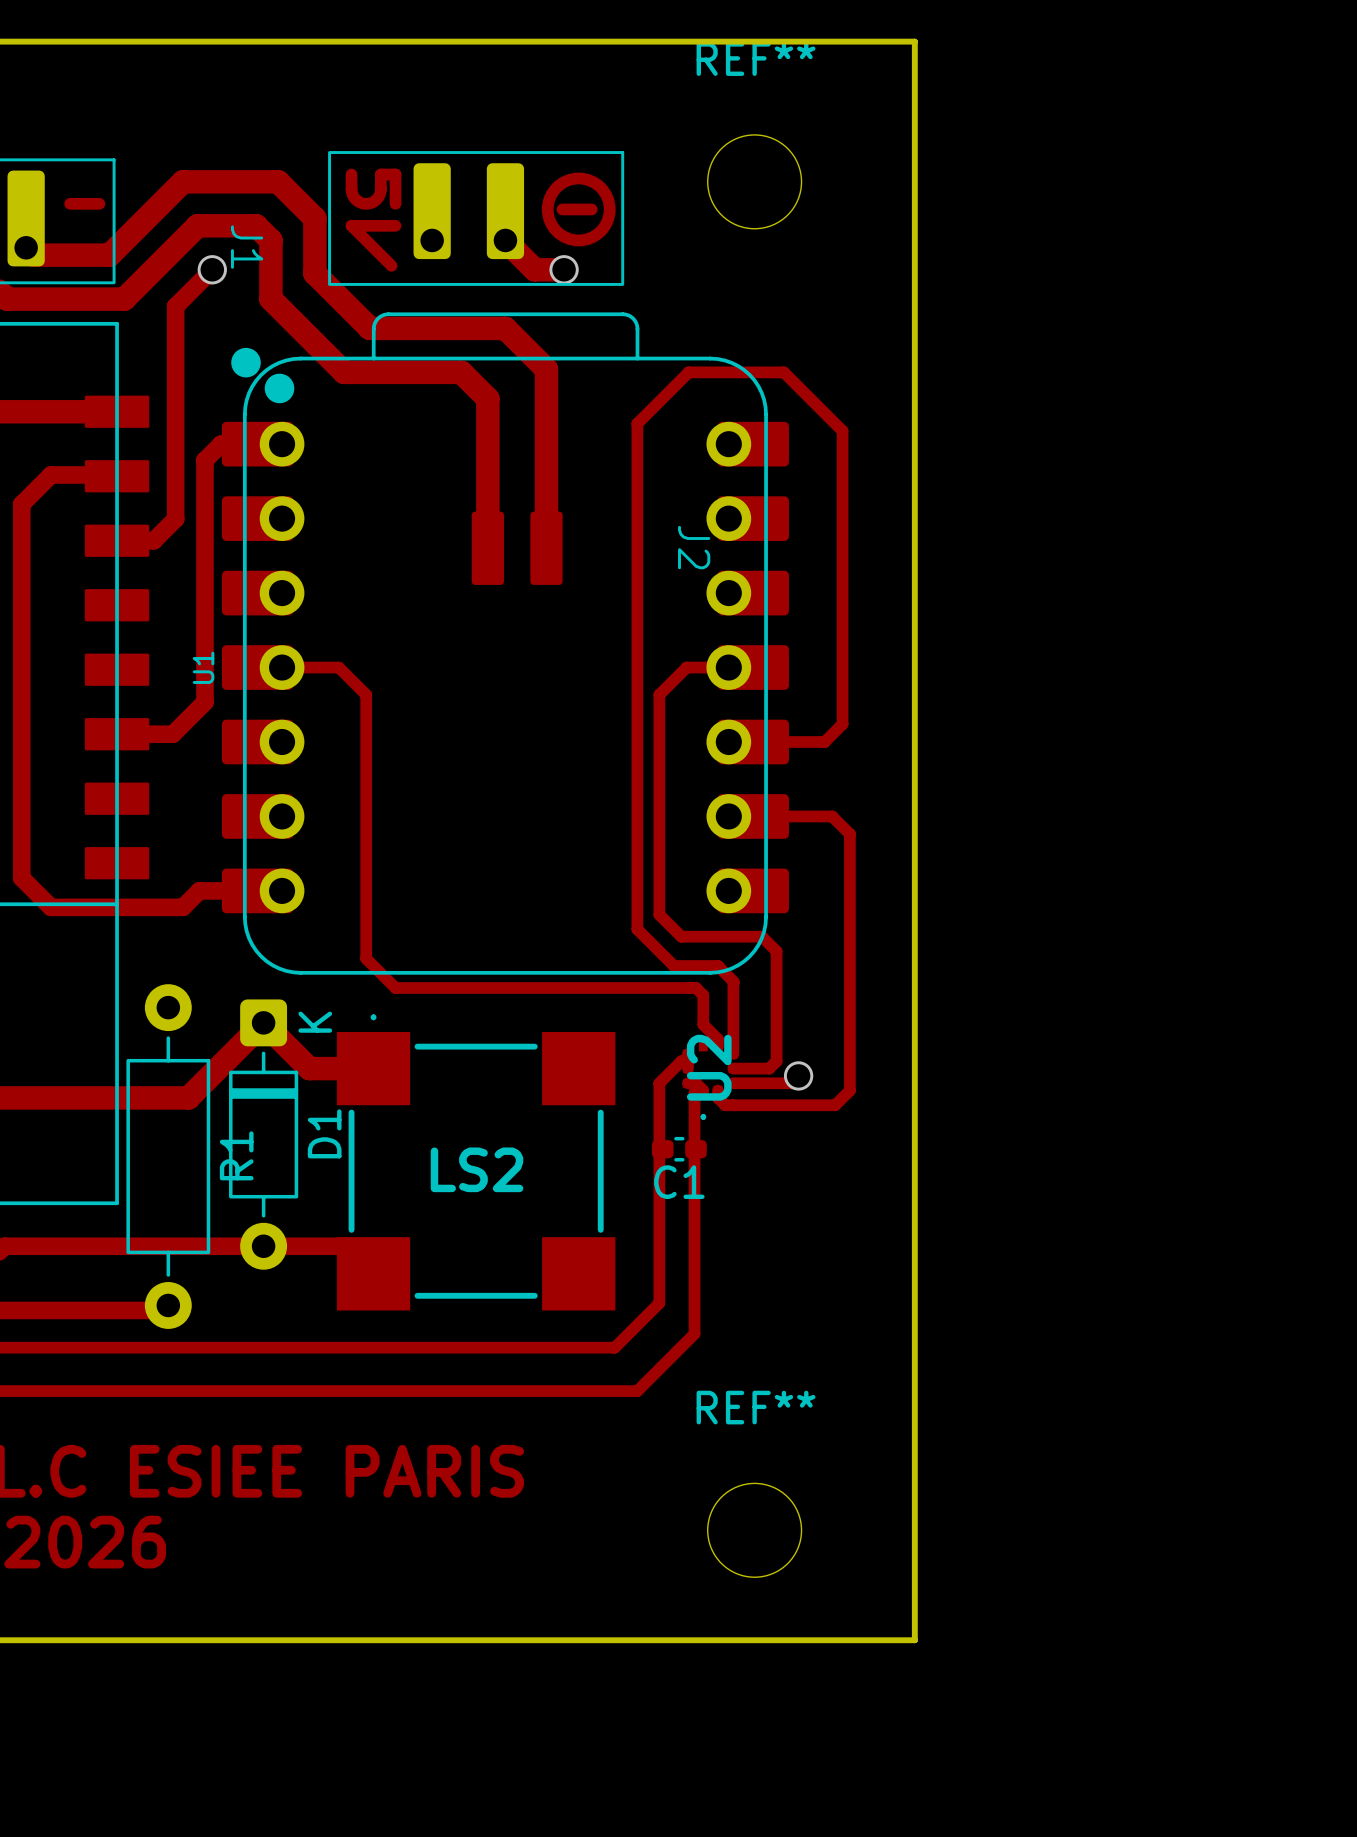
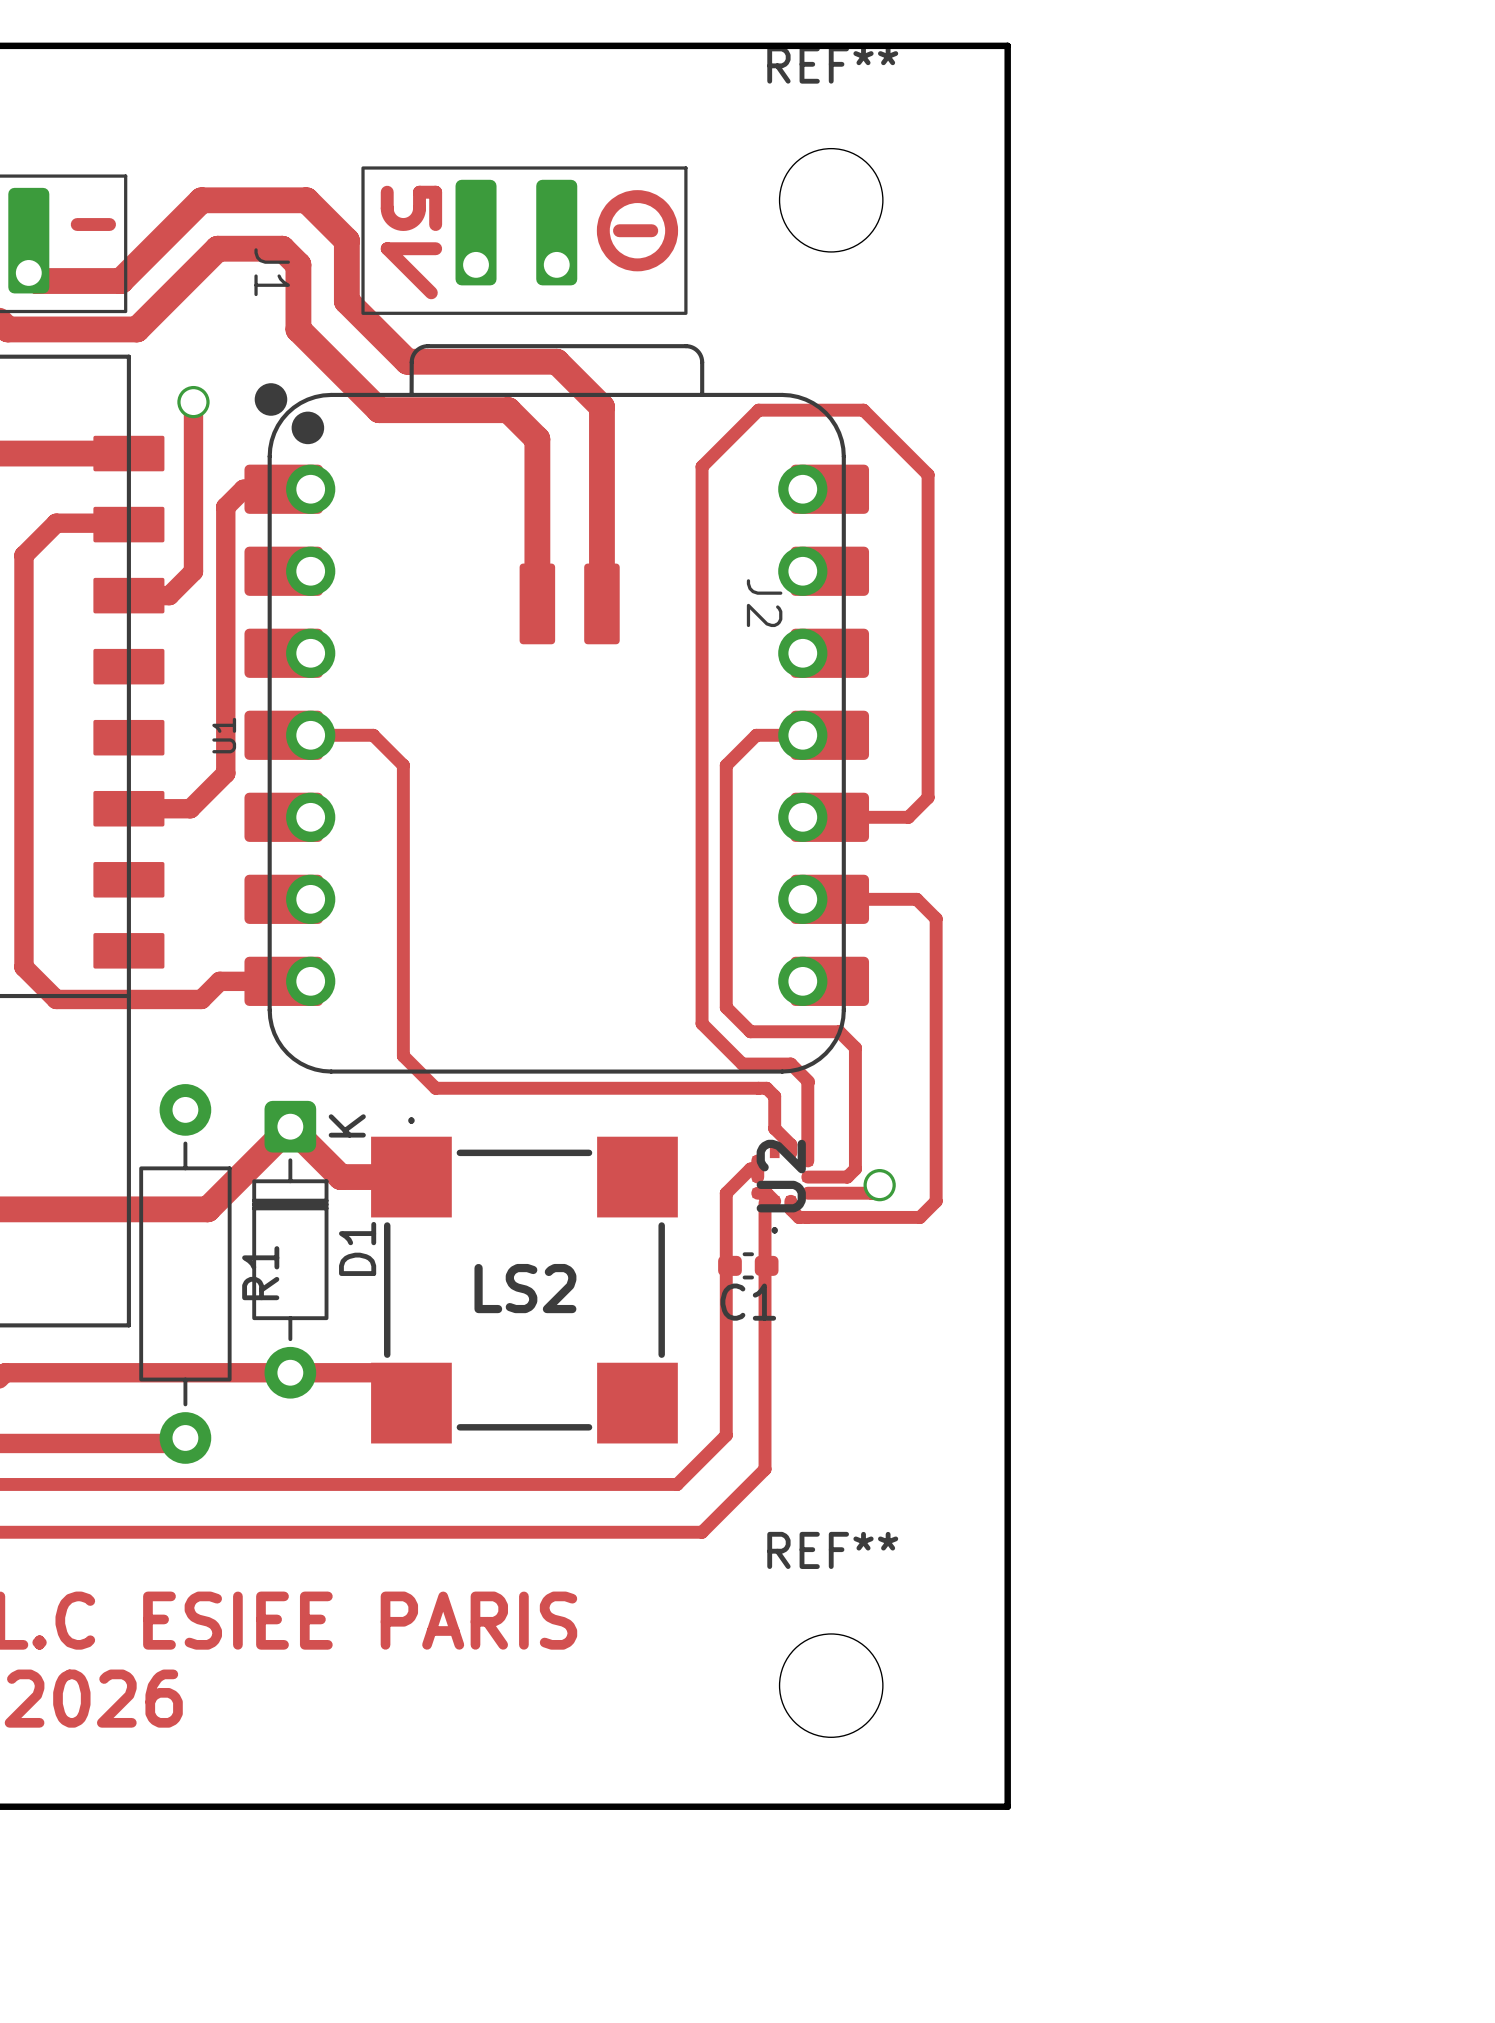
track: (505, 240) (534, 269) (564, 269) -> none
track: (212, 269) (175, 306) (175, 365) -> none
via position: (212, 269) -> (193, 402)
via: (564, 269) -> none

